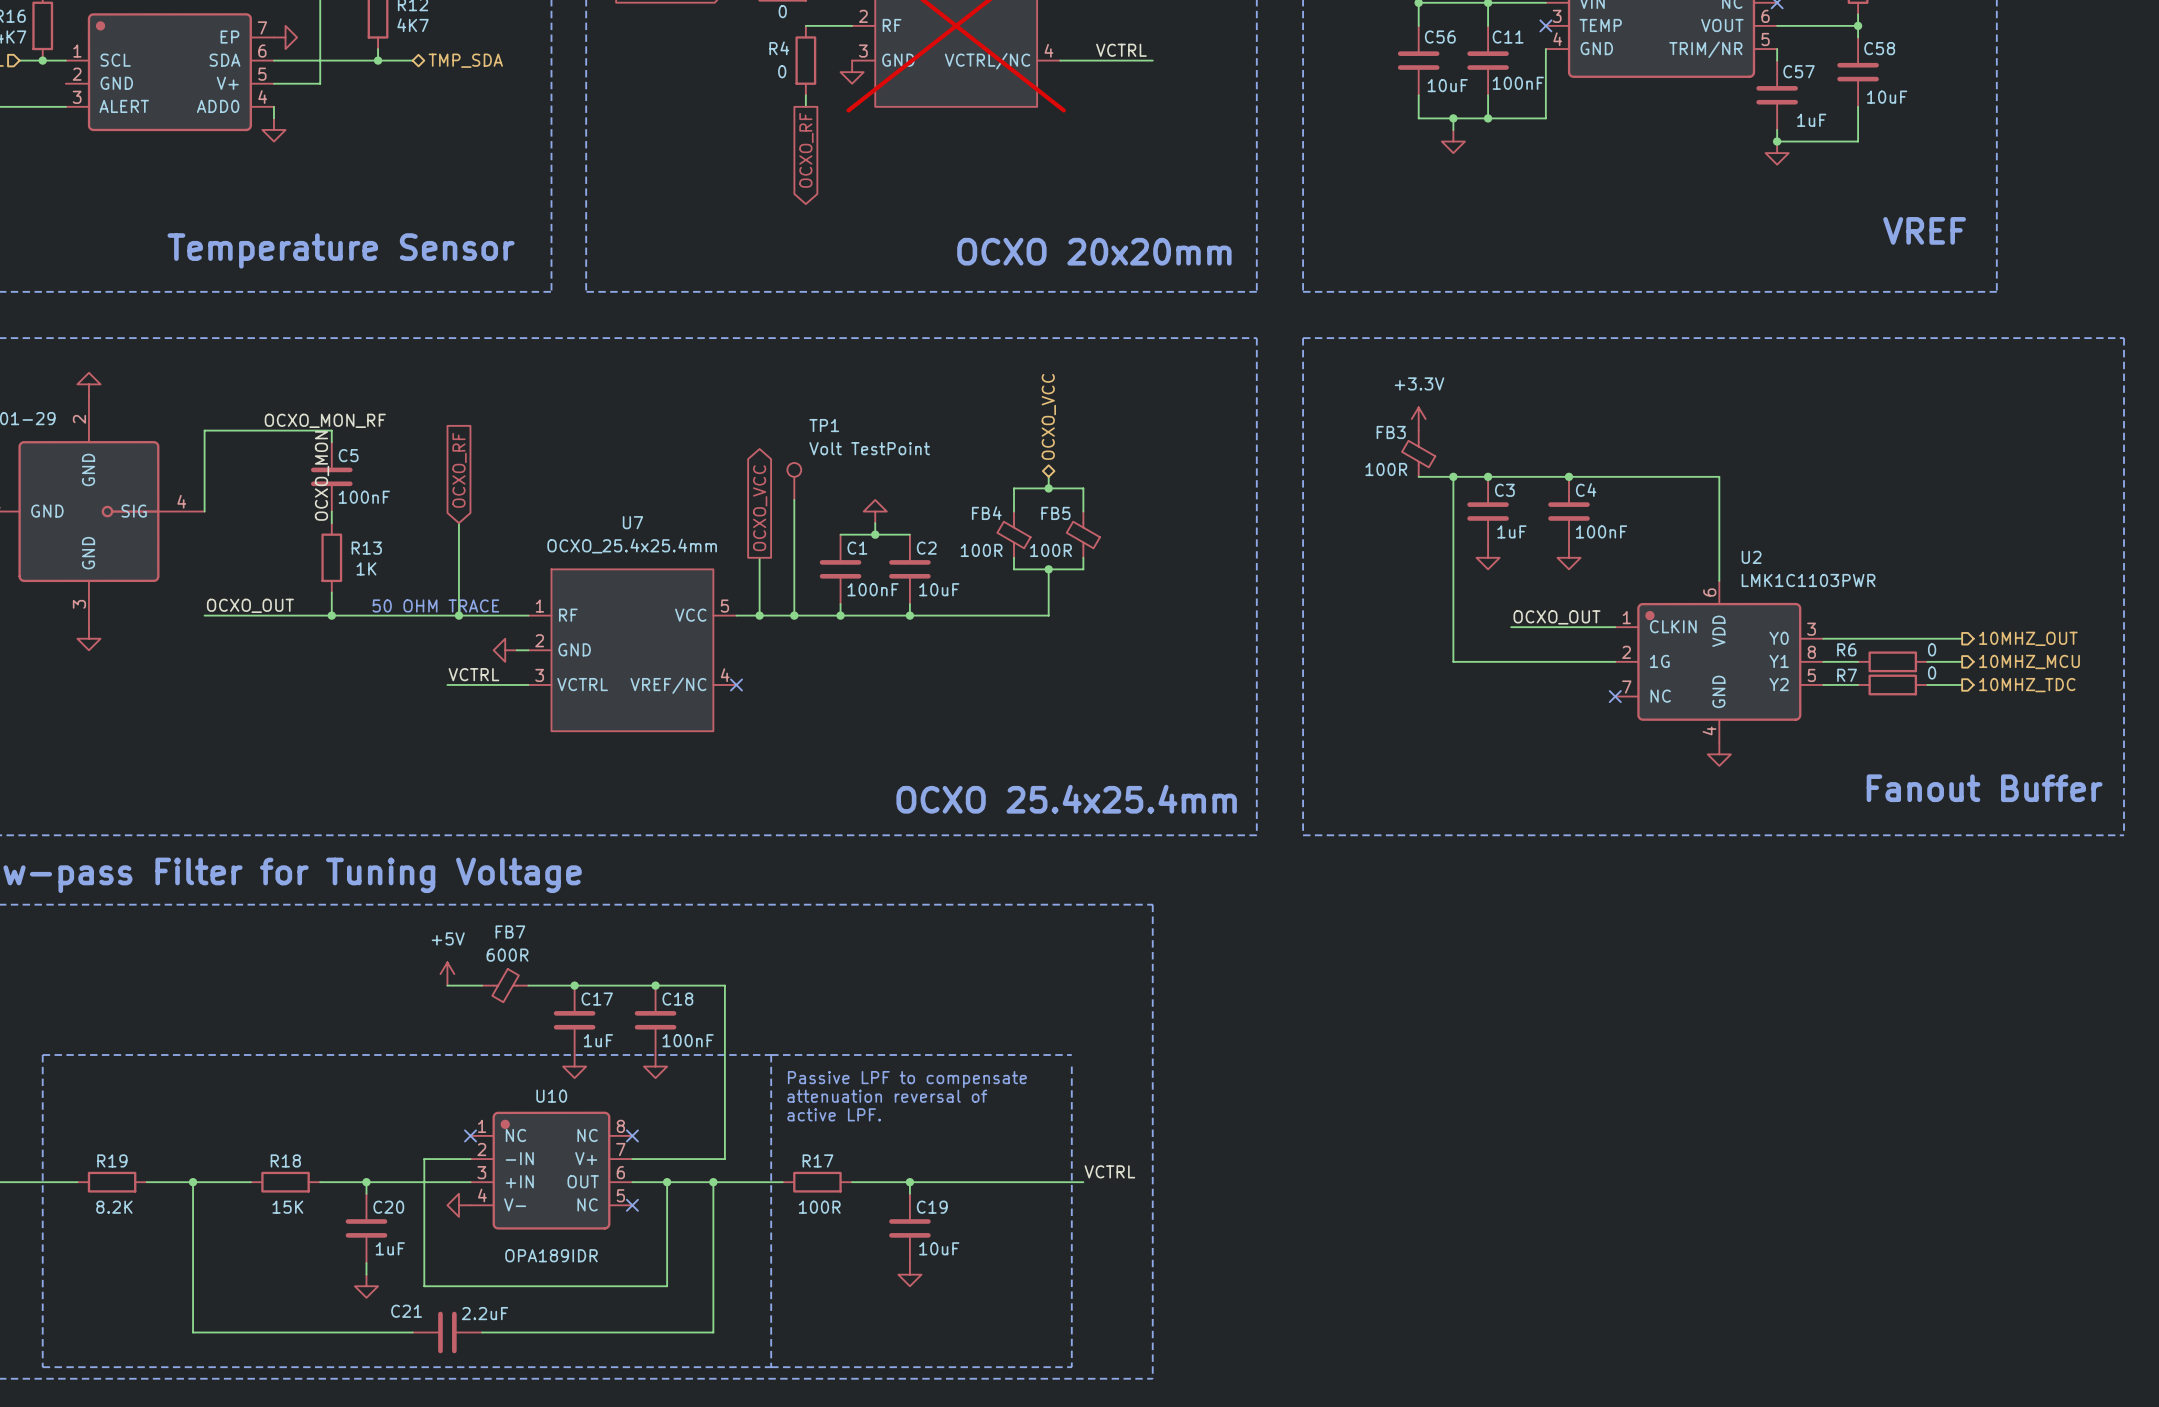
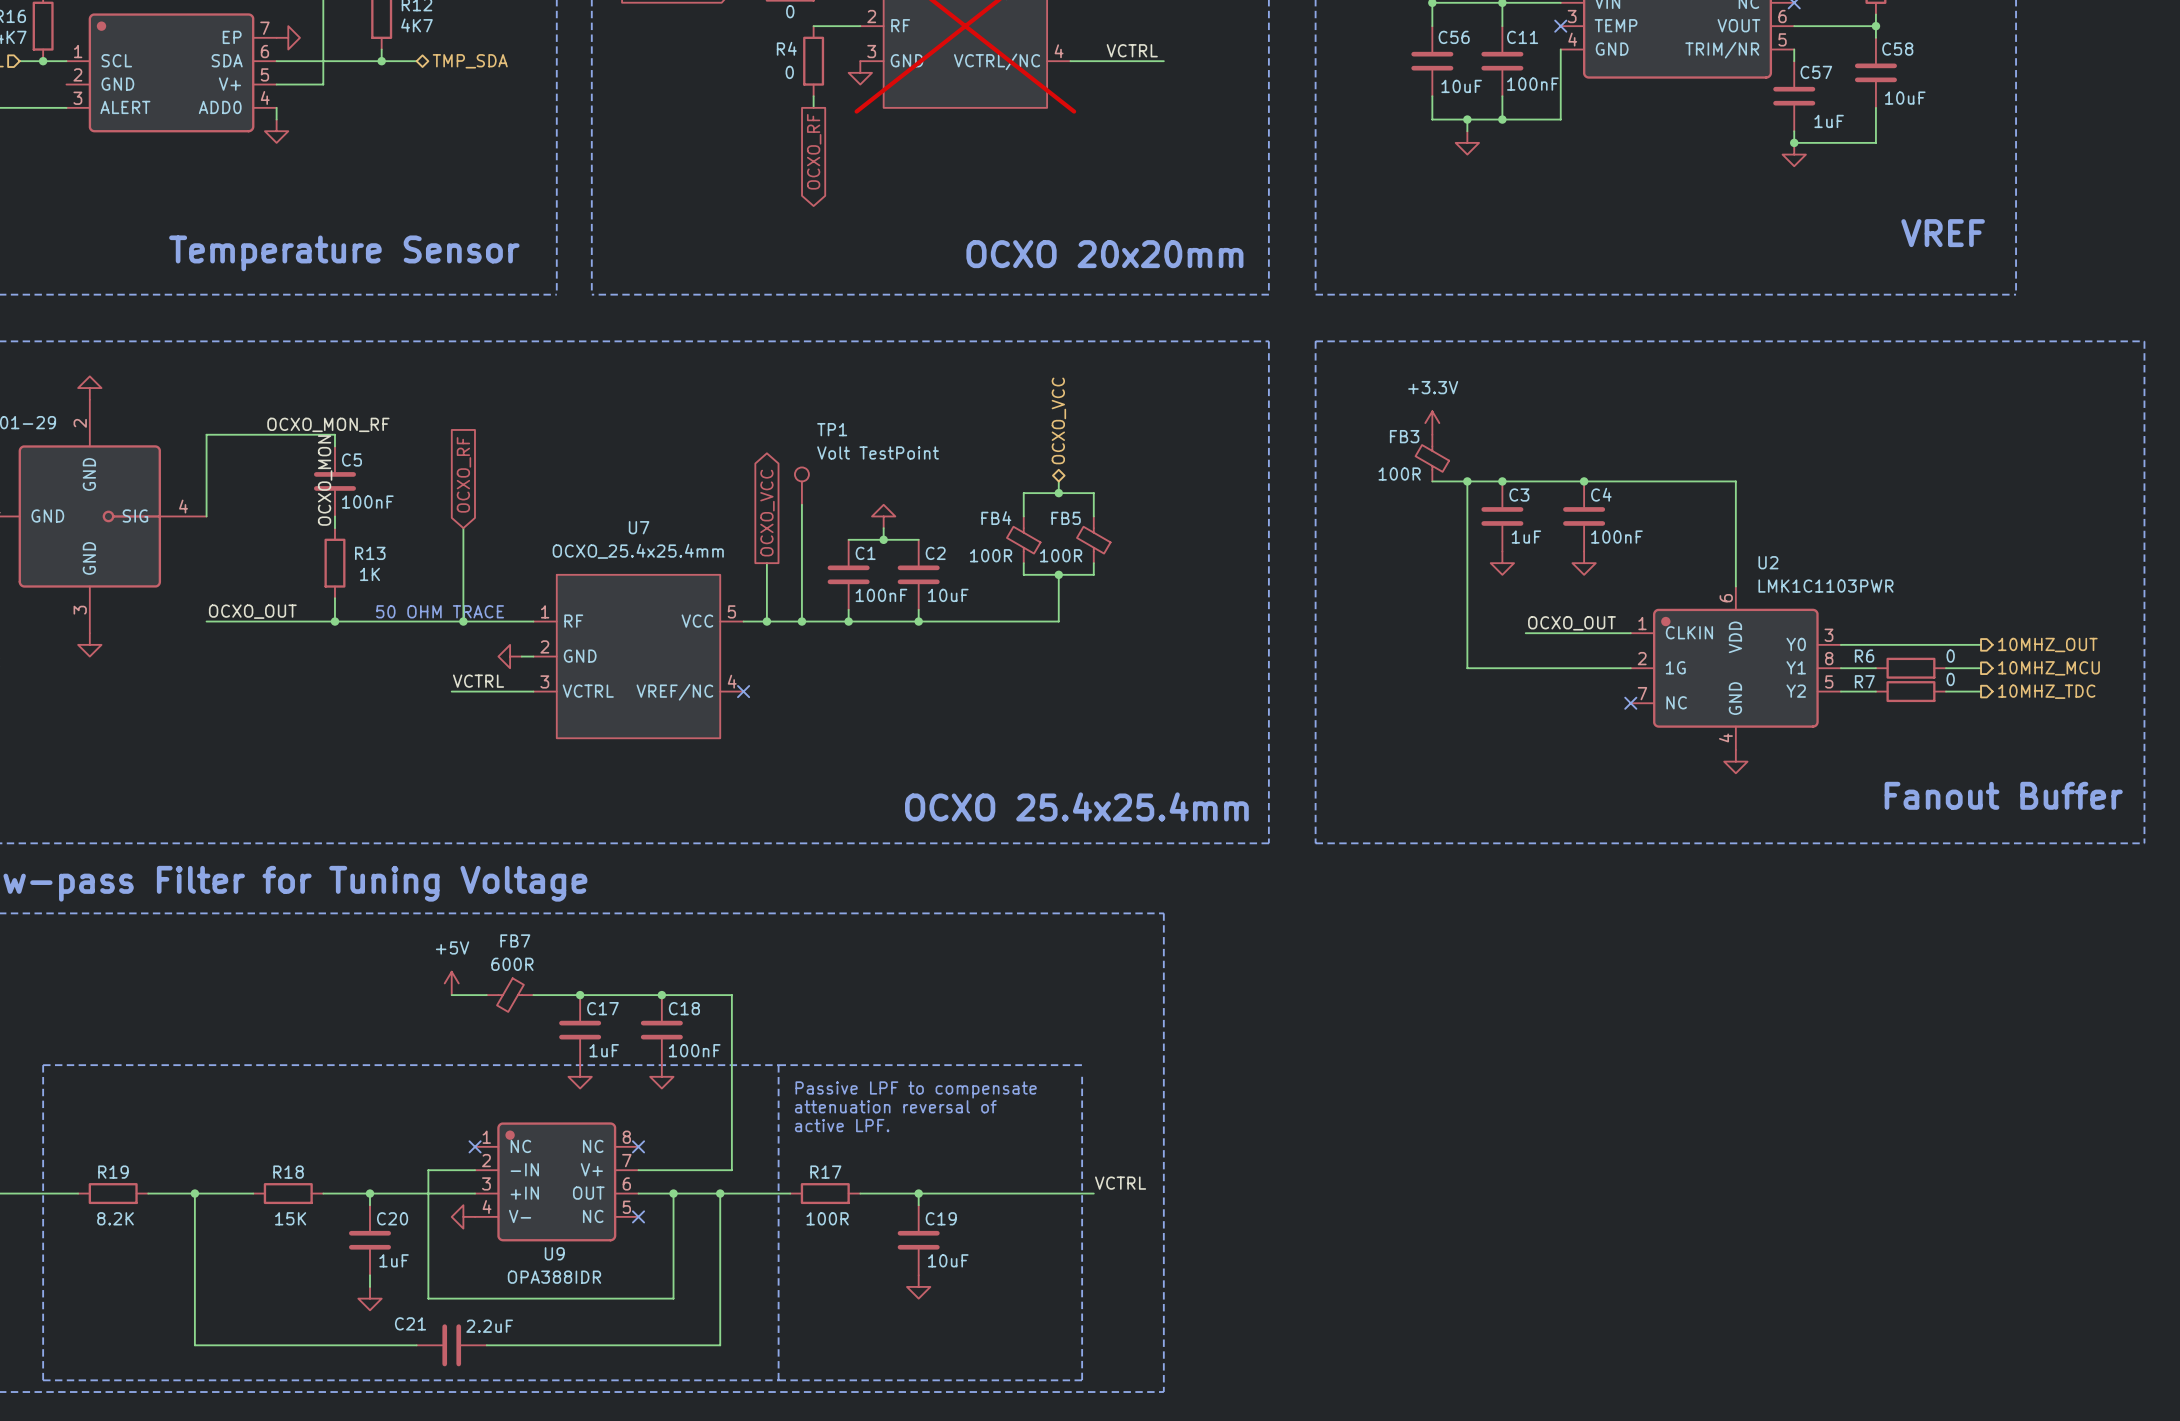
U10 name: U10 (551, 1096) -> U9 (554, 1253)
U10 value: OPA189IDR (551, 1255) -> OPA388IDR (554, 1277)

